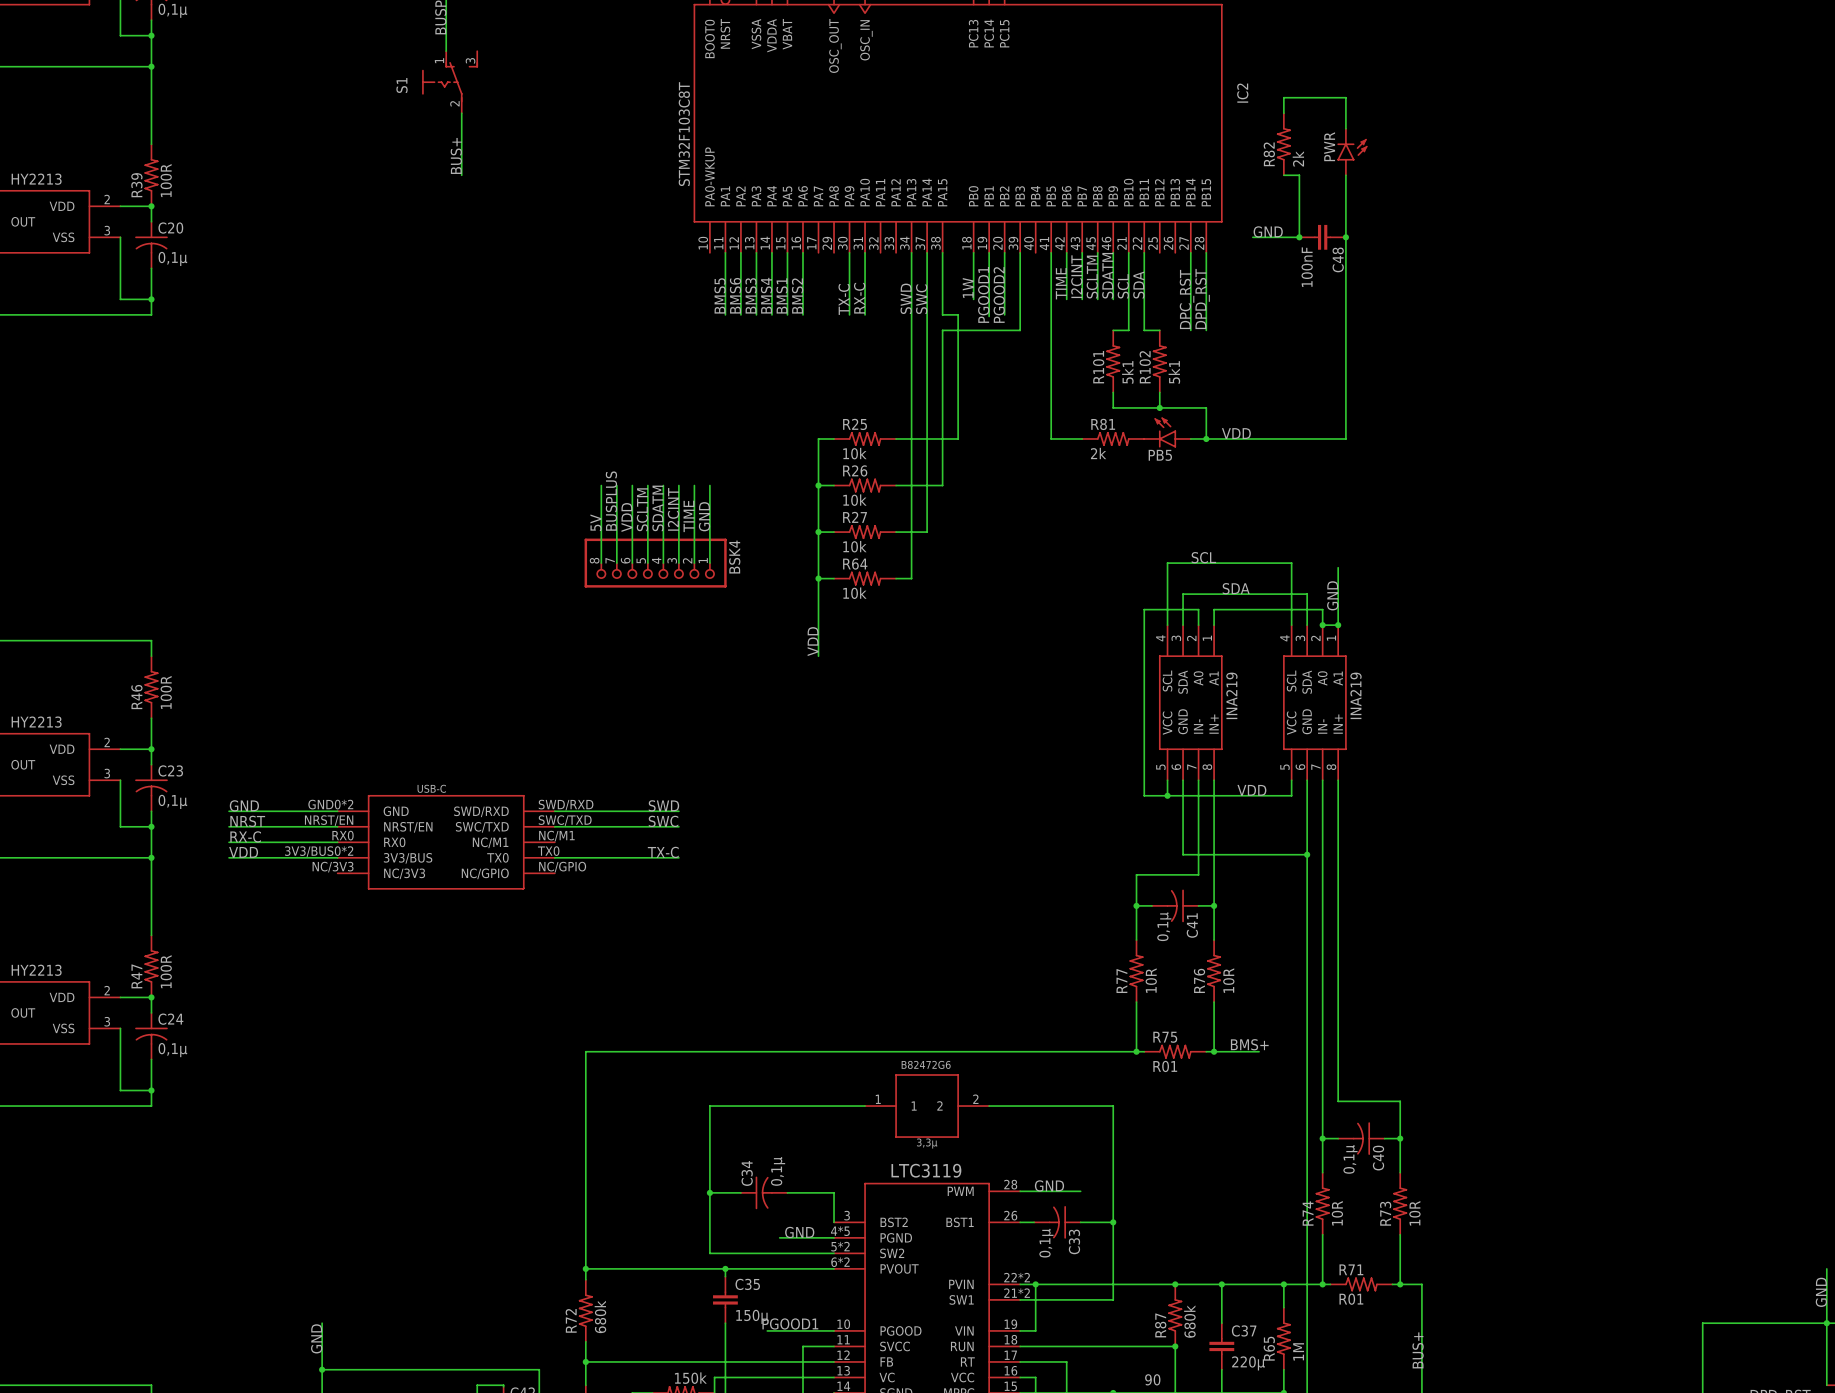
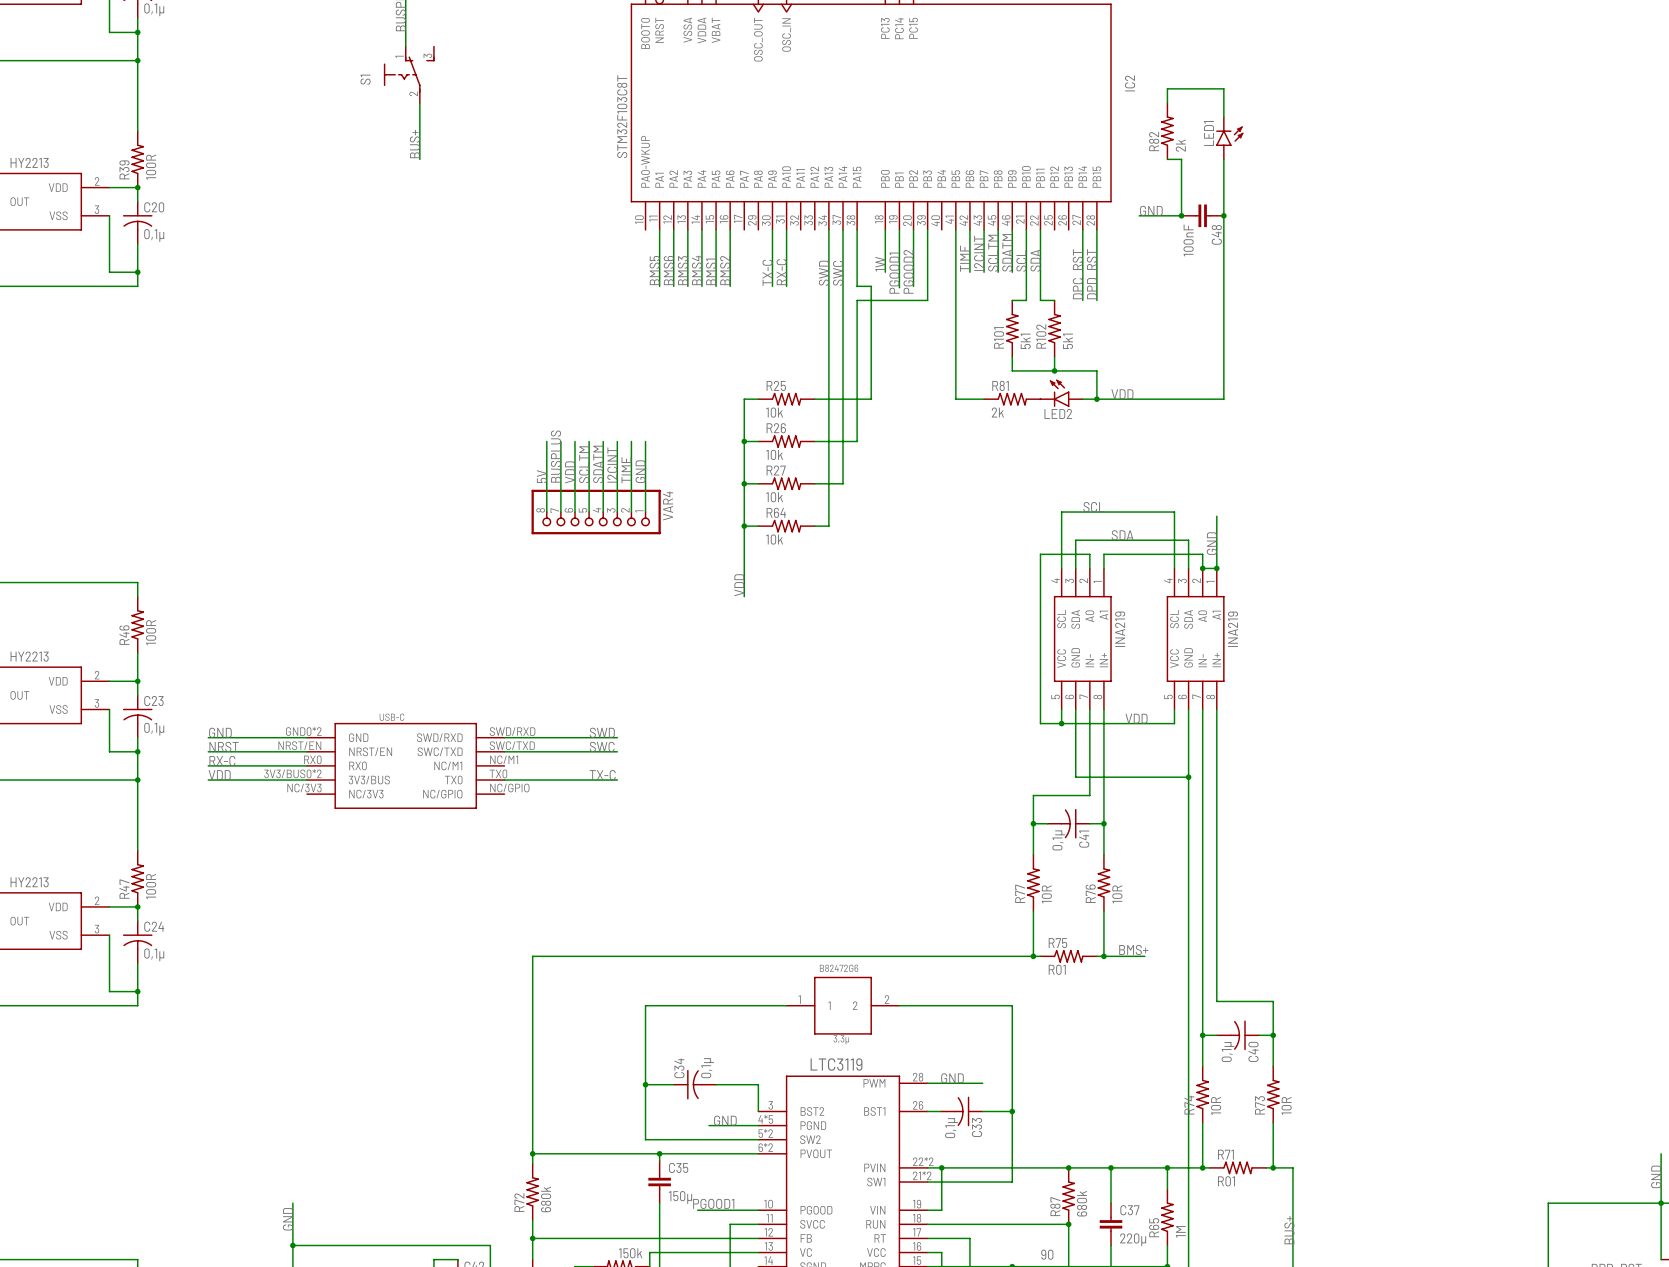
PWR name: PWR (1329, 146) -> LED1 (1209, 133)
PB5 name: PB5 (1160, 455) -> LED2 (1058, 413)
BSK4 name: BSK4 (734, 557) -> VAR4 (668, 506)

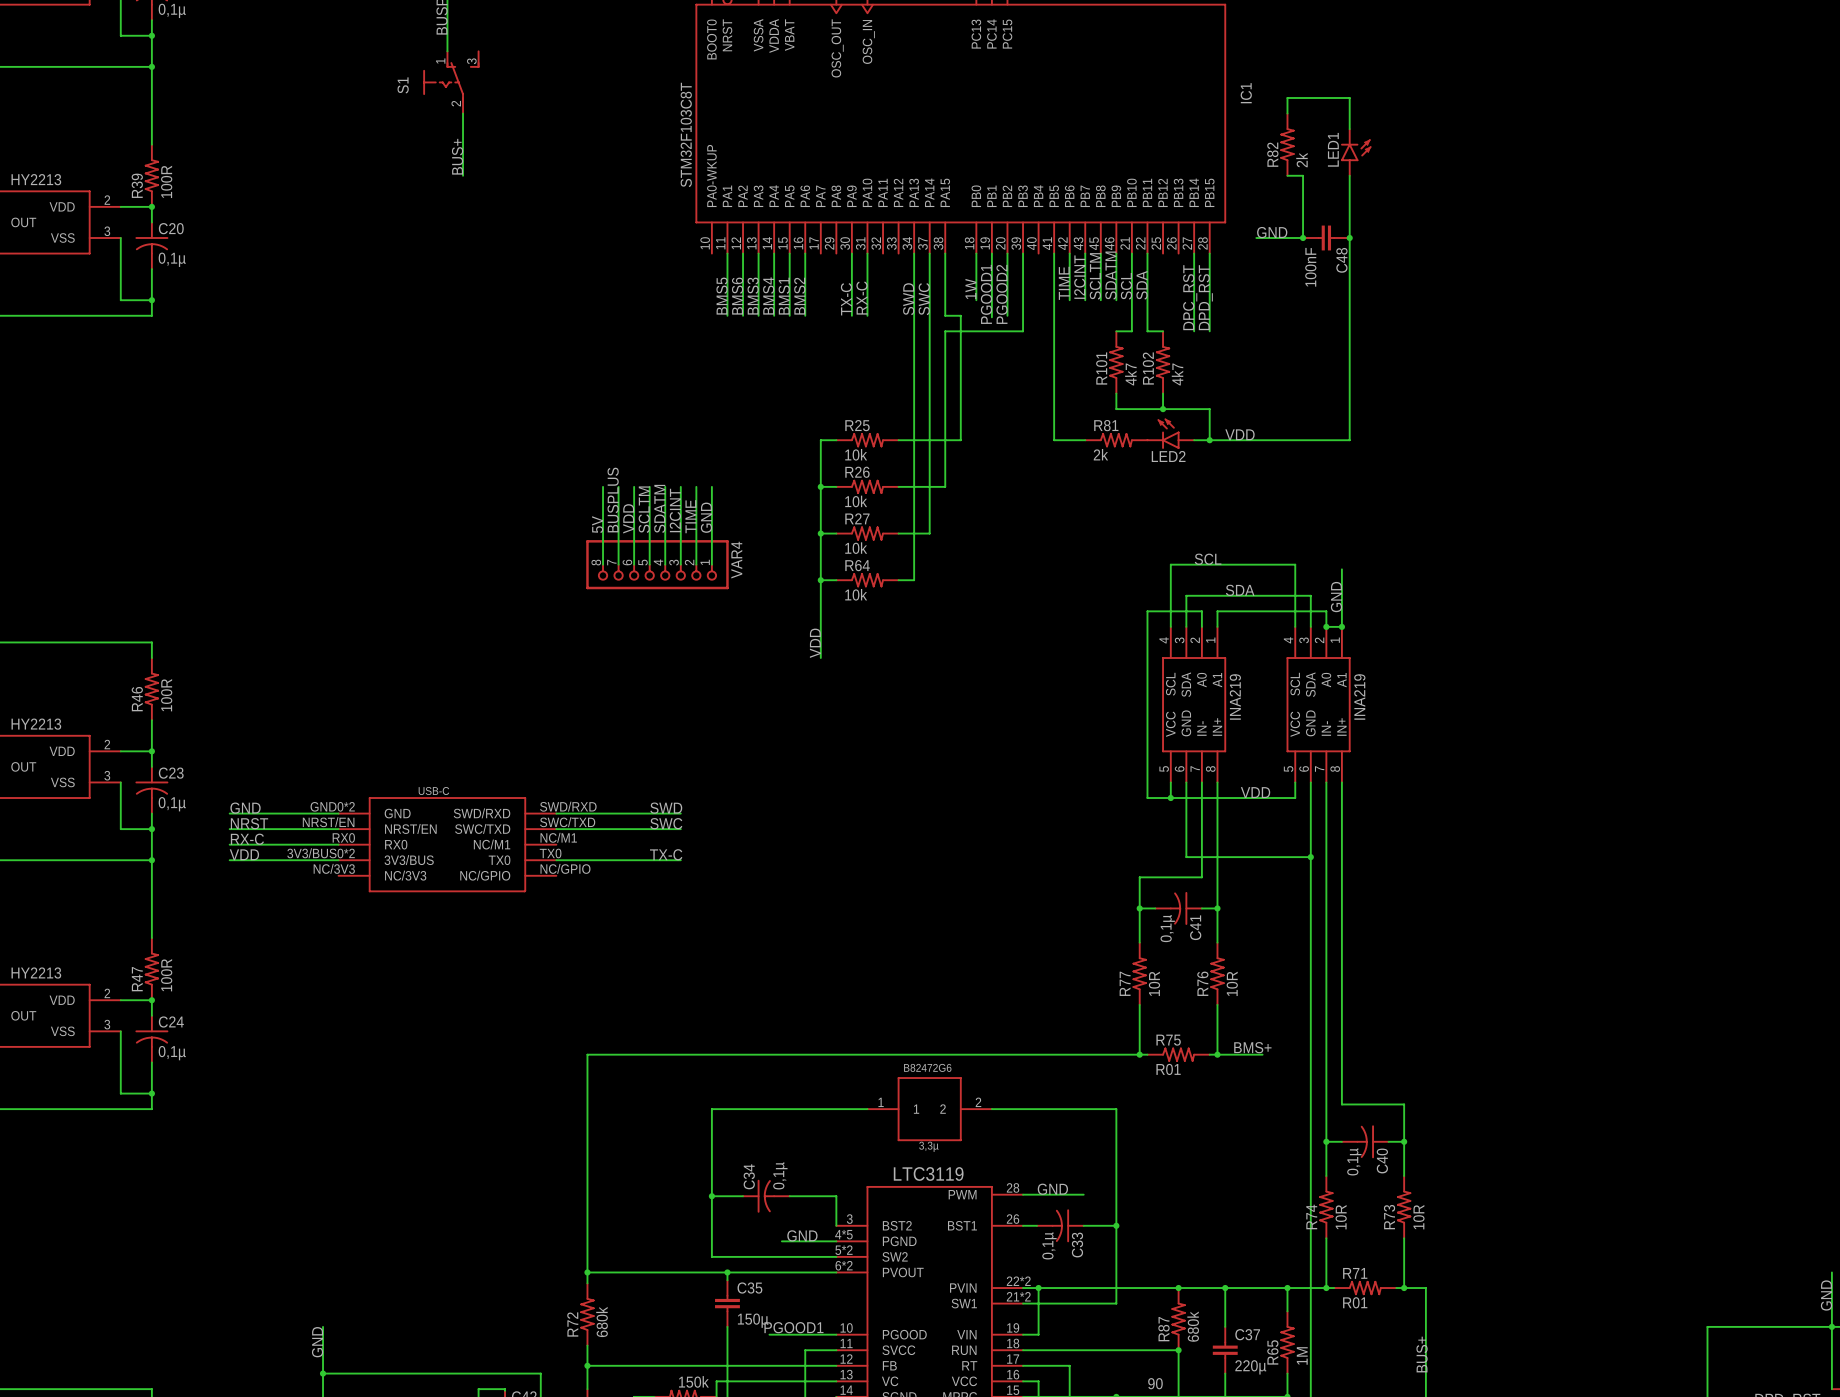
IC2 name: IC2 (1130, 83) -> IC1 (1246, 93)
R101 value: 5k1 (1025, 341) -> 4k7 (1130, 374)
R102 value: 5k1 (1068, 341) -> 4k7 (1177, 374)

